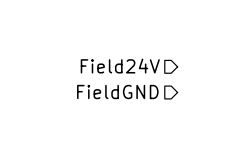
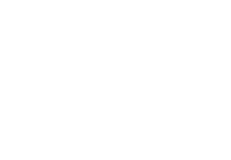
hierarchical label: Field24V (120, 66) -> none
hierarchical label: FieldGND (117, 92) -> none

